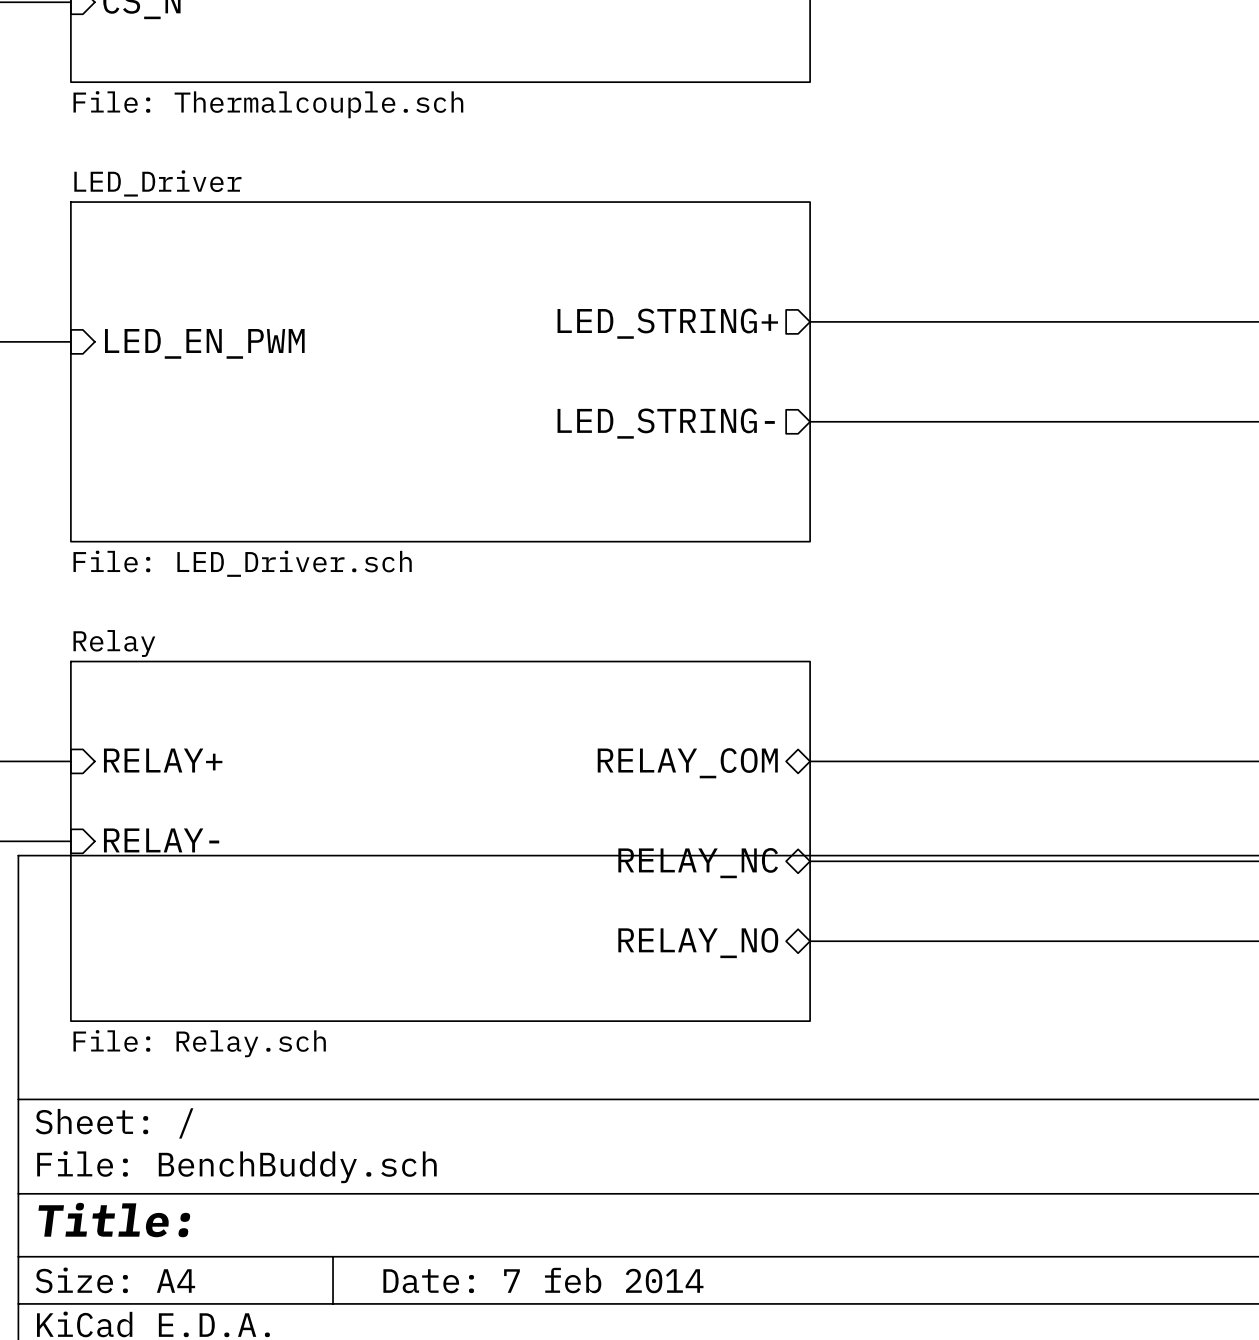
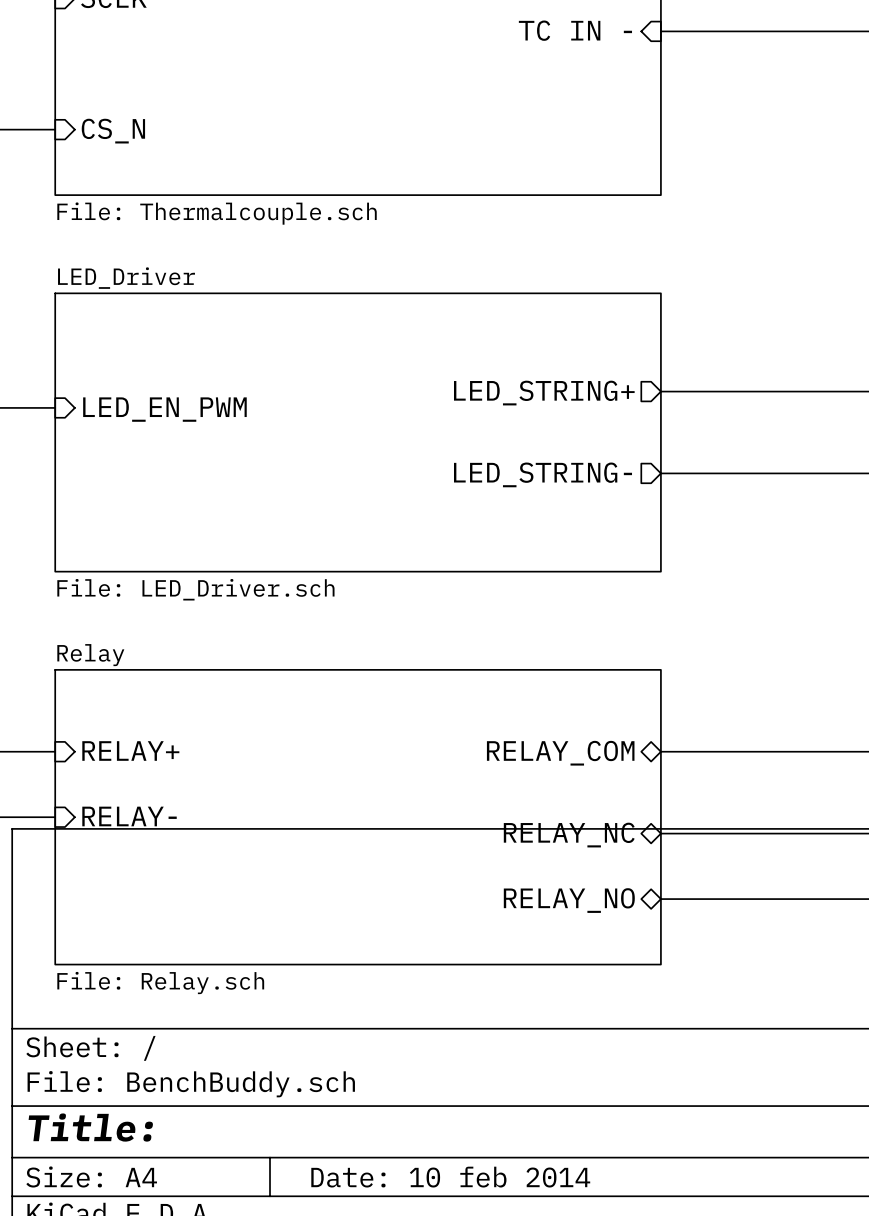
title block: Date: 7 feb 2014 (543, 1280) -> Date: 10 feb 2014 (450, 1177)

